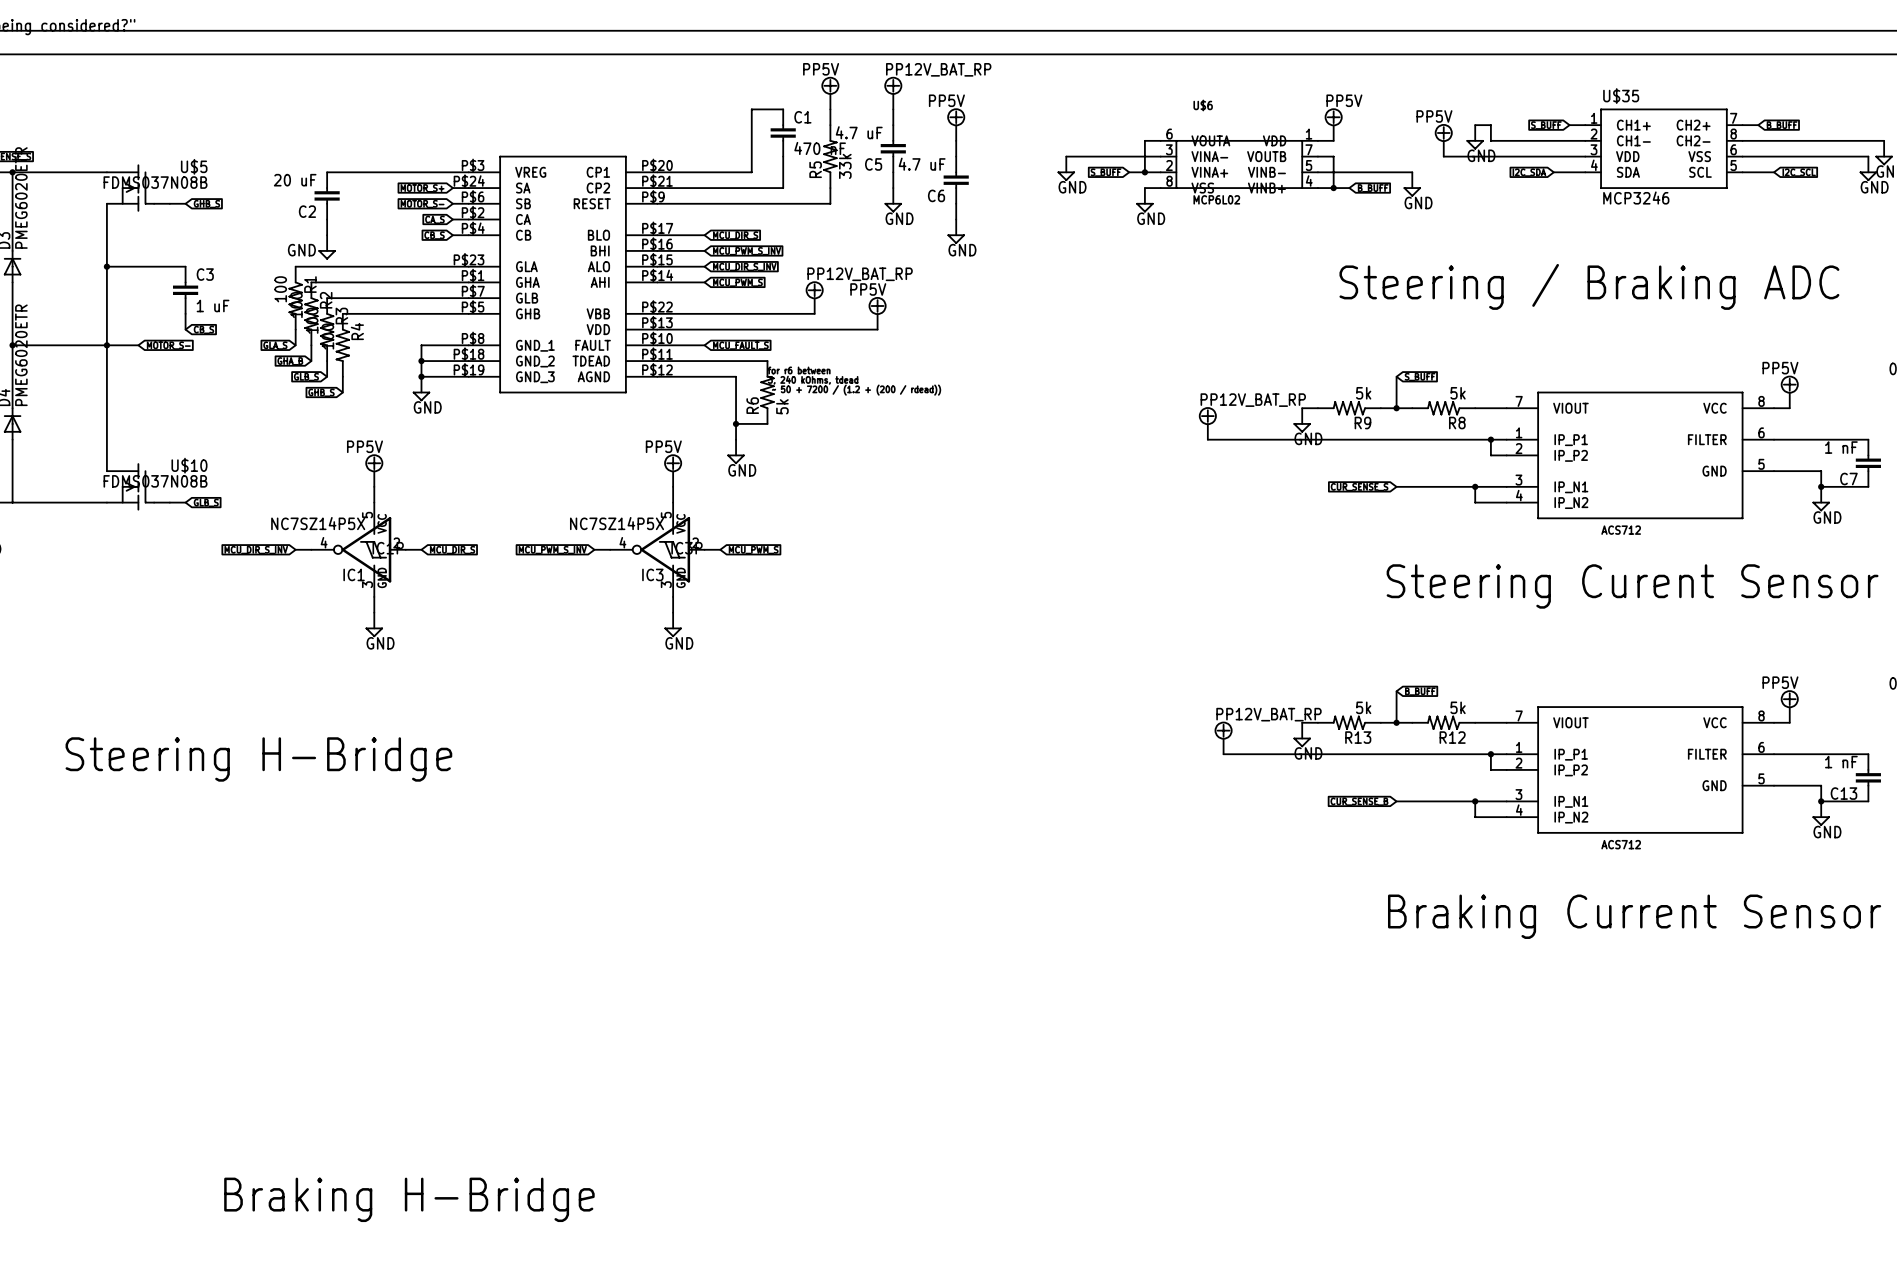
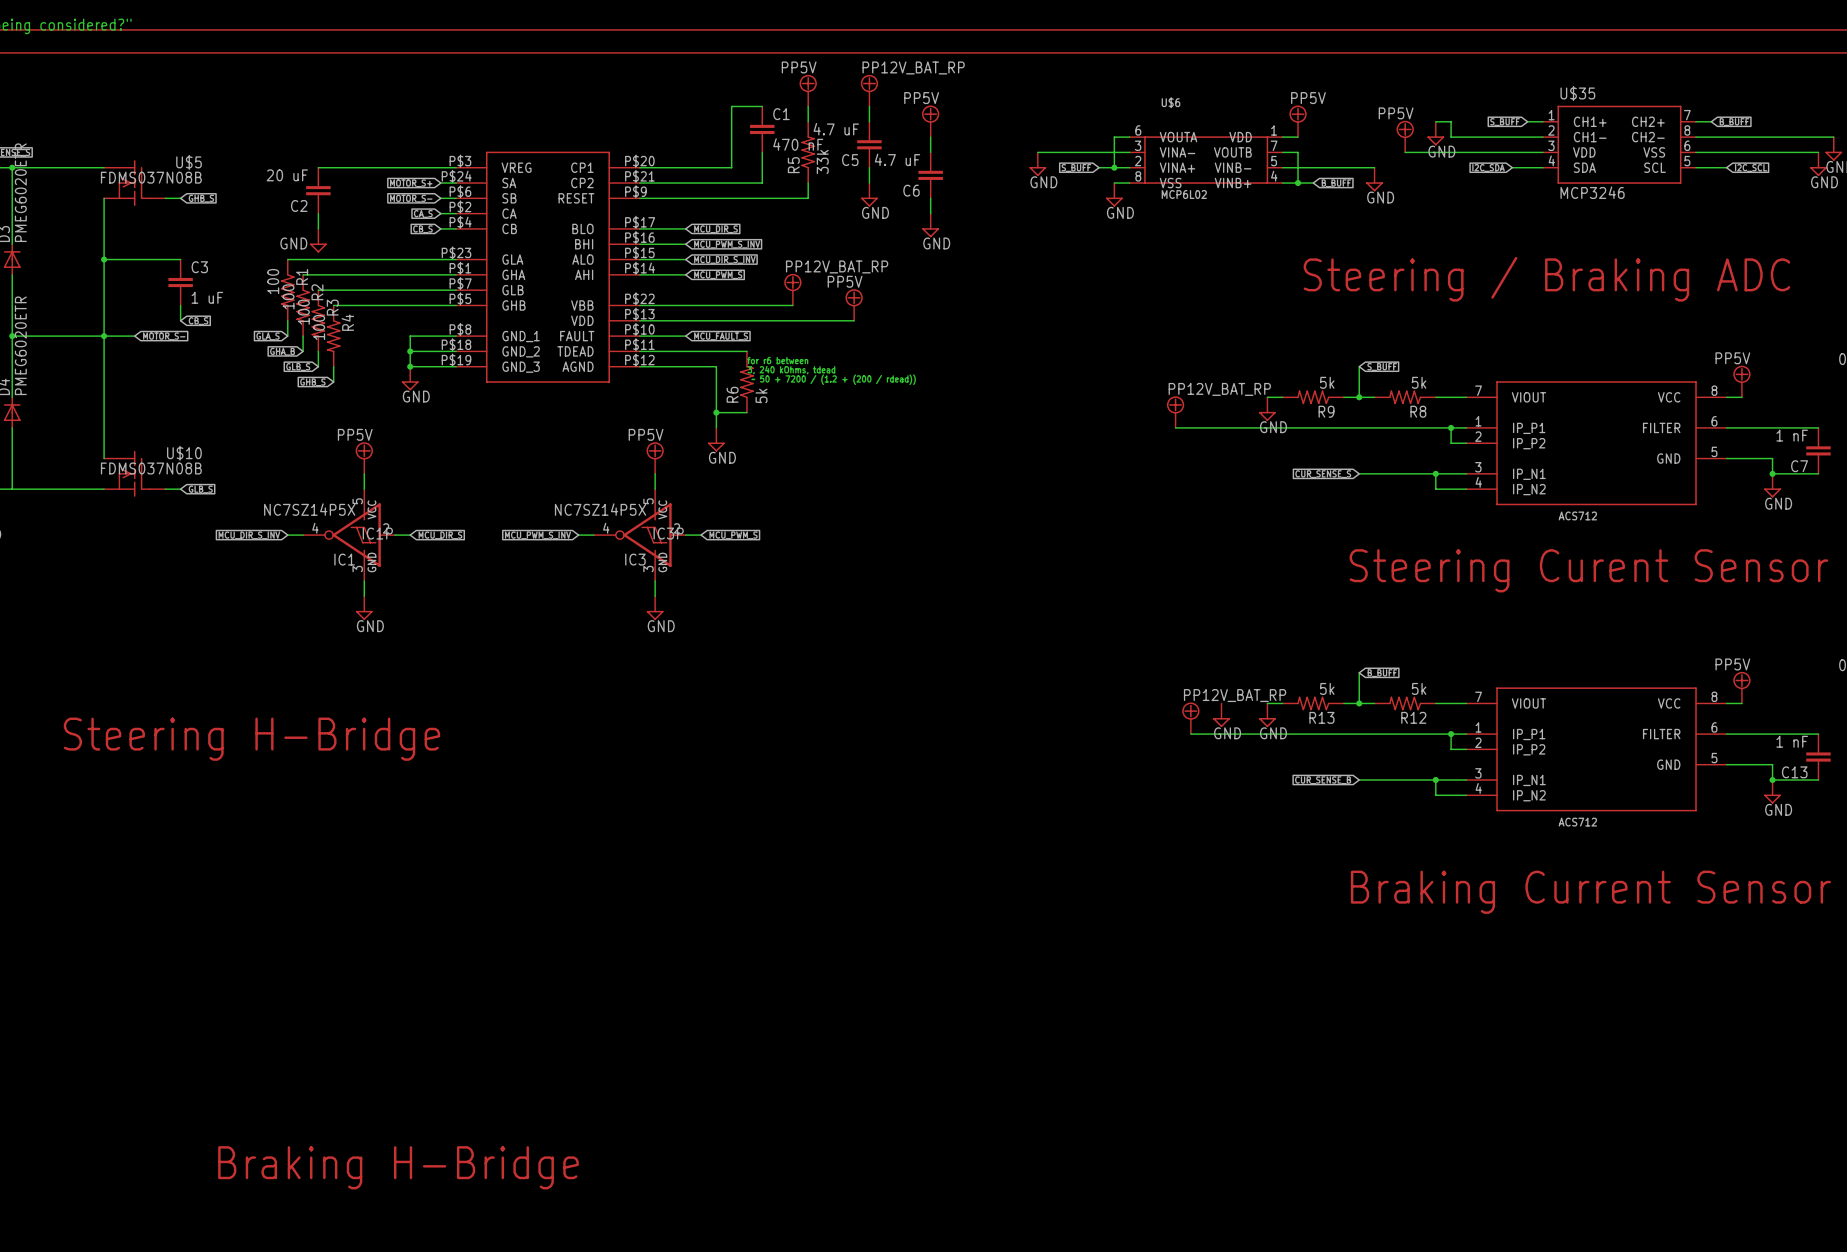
power symbol: none -> GND (1221, 715)

